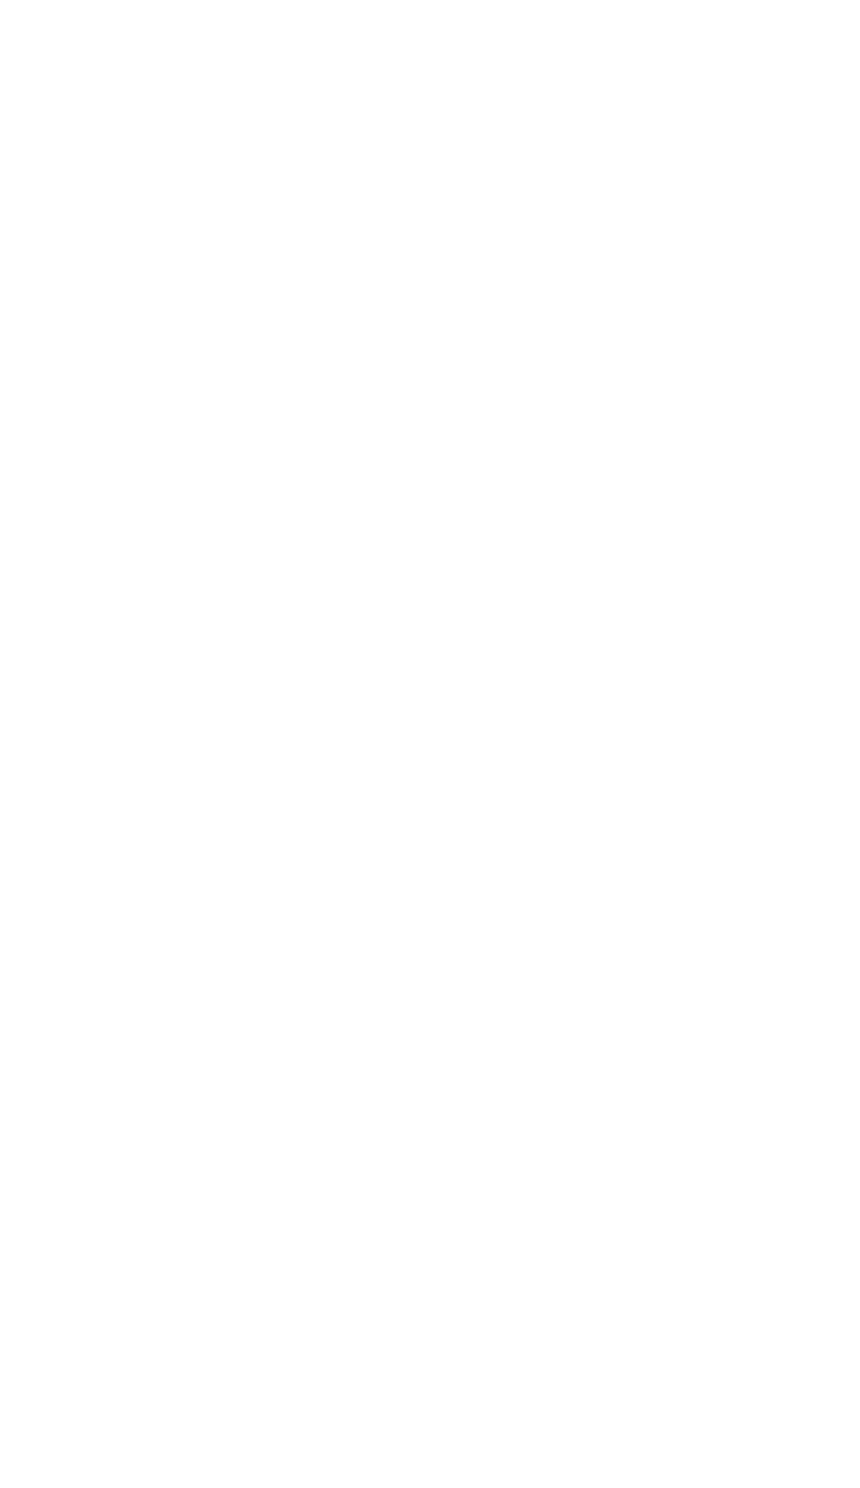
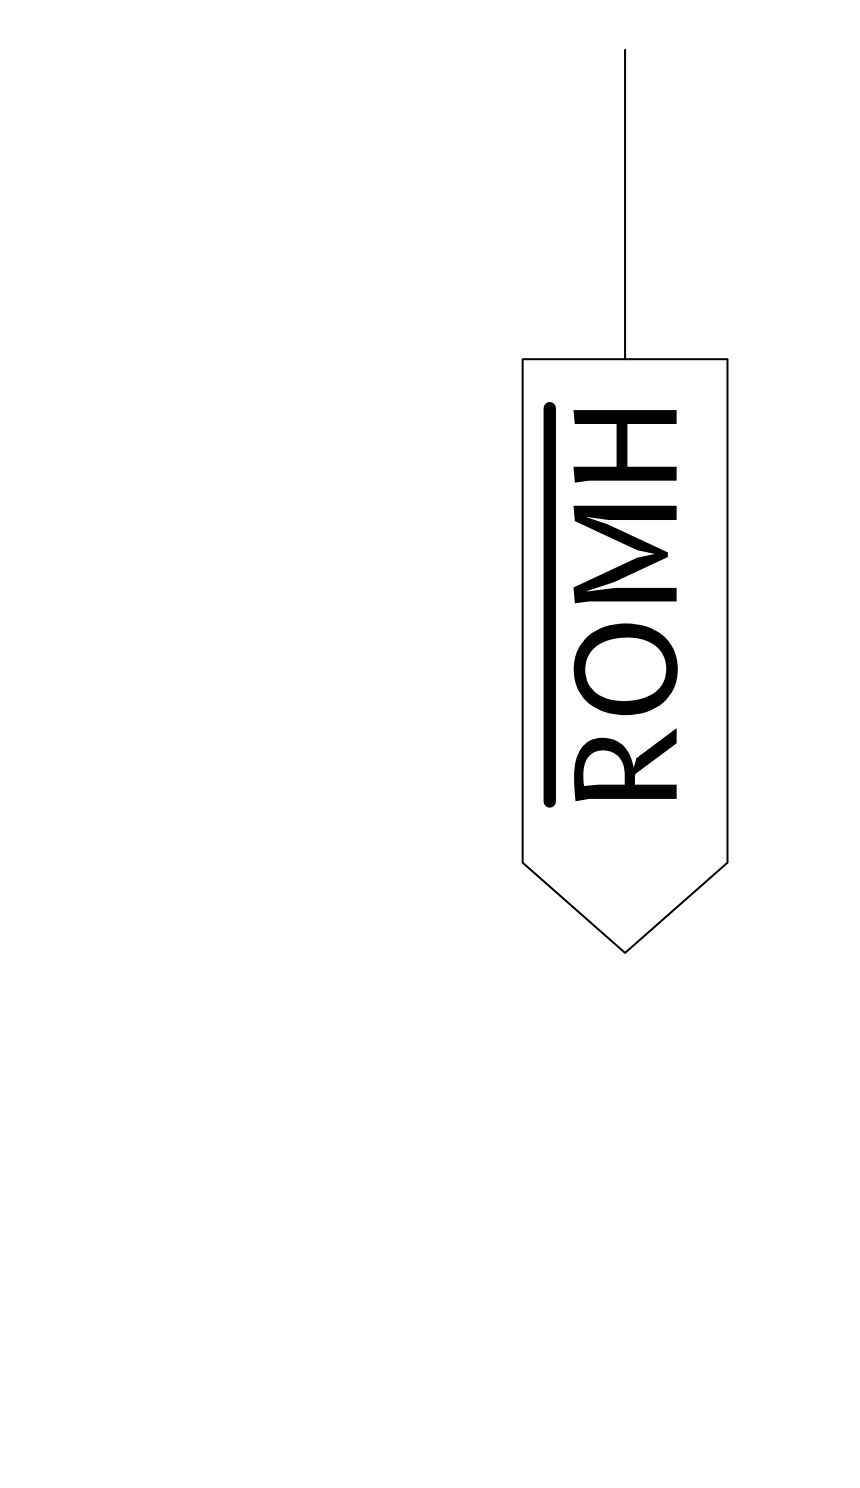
wire: none -> (625, 49) (625, 359)
global label: none -> ~{ROMH} (613, 604)

